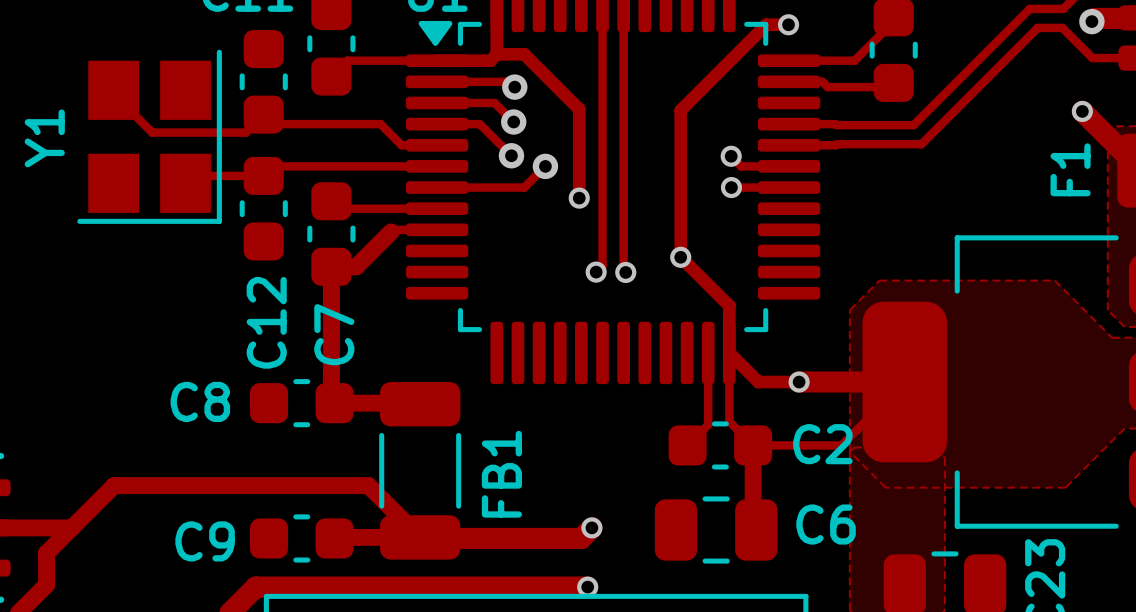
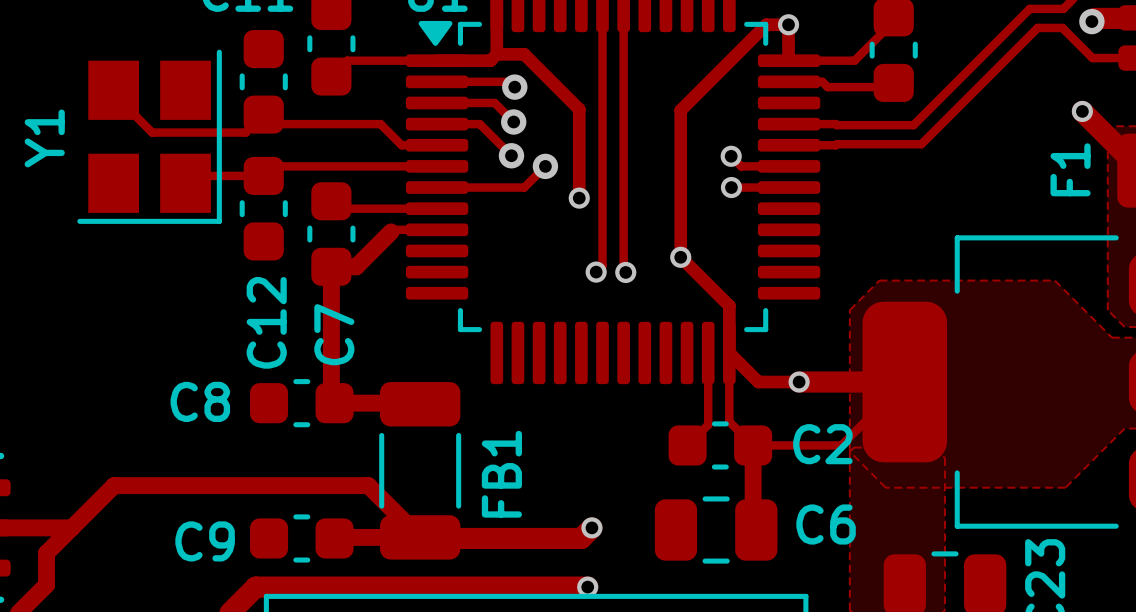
track: none -> (788, 24) (788, 60)

